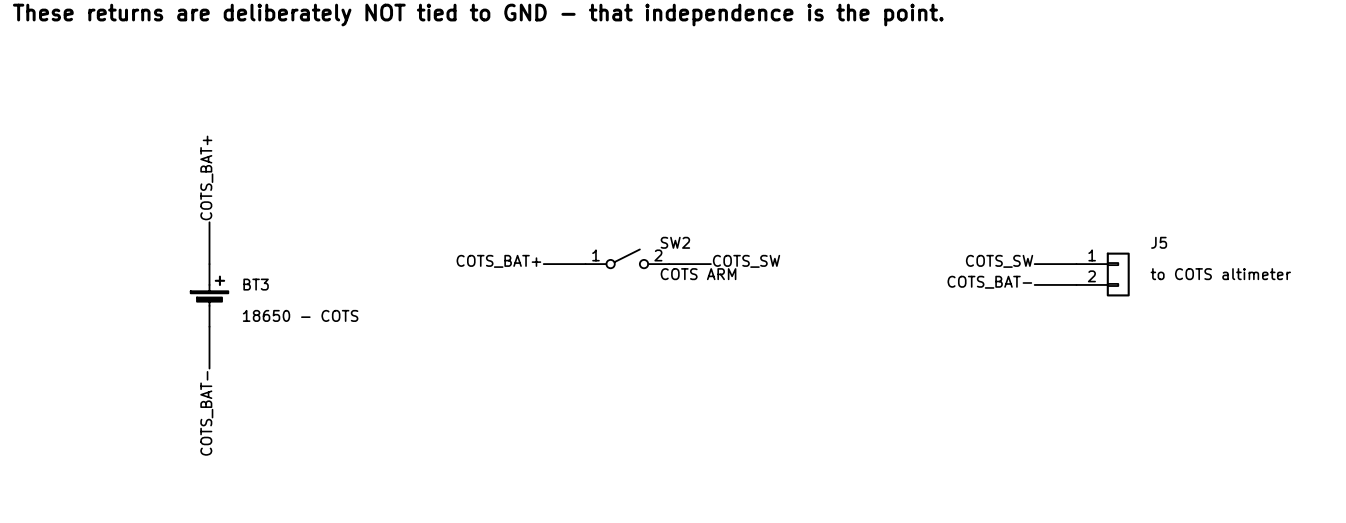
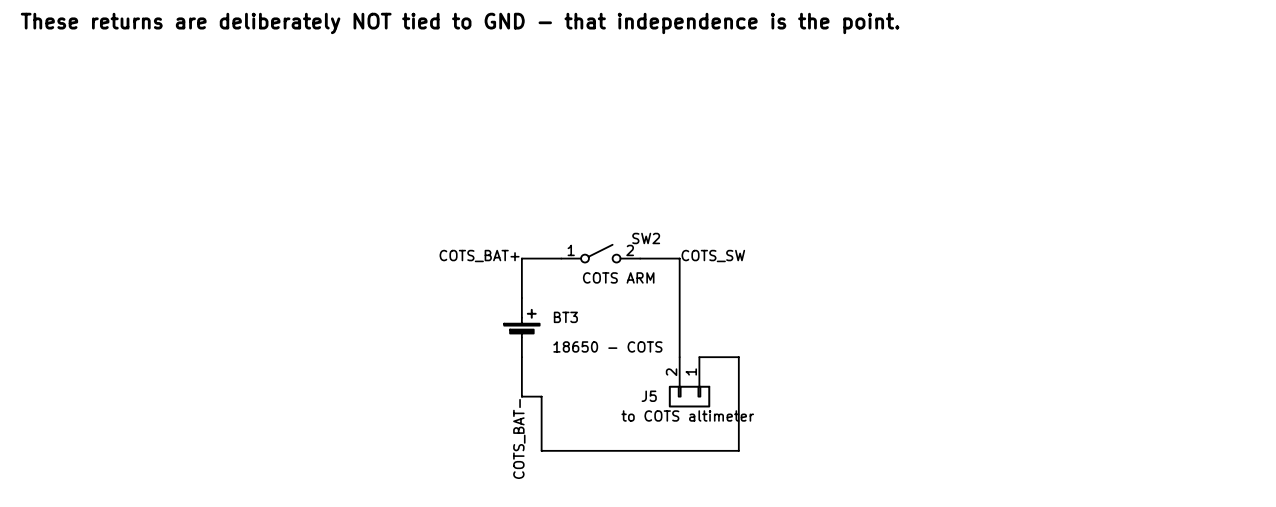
label: COTS_BAT+ (206, 177) -> none
wire: (209, 222) (209, 264) -> none
J5 name position: J5 (1159, 242) -> J5 (649, 396)
label: COTS_SW (999, 261) -> none
wire: none -> (521, 258) (521, 298)
wire: none -> (679, 258) (679, 357)
wire: (1034, 264) (1076, 264) -> none
SW2 value position: COTS ARM (698, 274) -> COTS ARM (618, 277)
J5 position: (1103, 274) -> (689, 382)
J5 rotation: 0° (1118, 274) -> 90° clockwise (689, 396)
J5 value position: to COTS altimeter (1220, 274) -> to COTS altimeter (687, 415)
label: COTS_BAT- (989, 282) -> none
wire: (1034, 284) (1076, 284) -> none
BT3 position: (209, 295) -> (521, 327)
wire: (209, 326) (209, 368) -> none
wire: none -> (521, 357) (521, 396) (541, 396) (541, 450) (738, 450) (738, 357) (699, 357)
label: COTS_BAT- (206, 413) -> none
label: none -> COTS_BAT- (519, 438)

